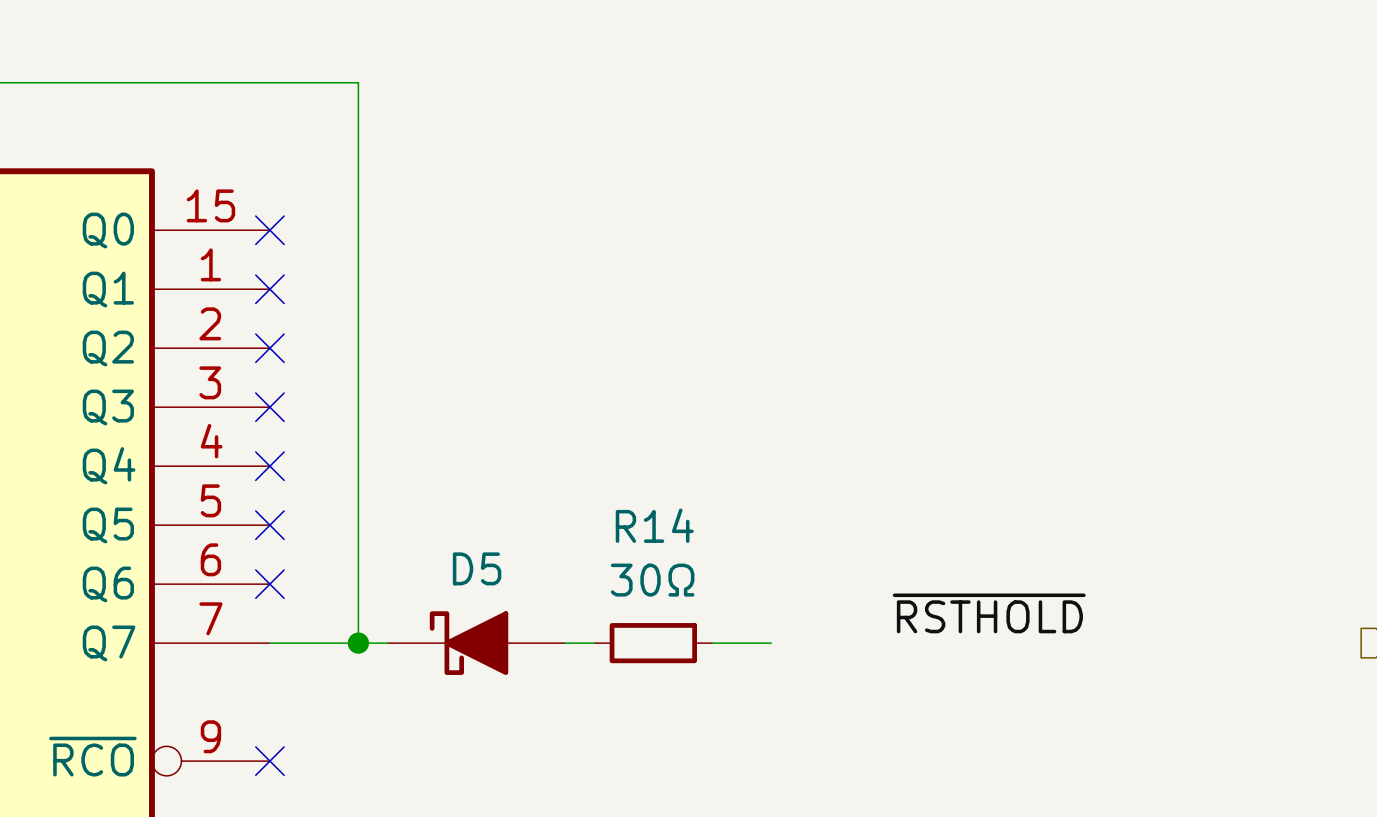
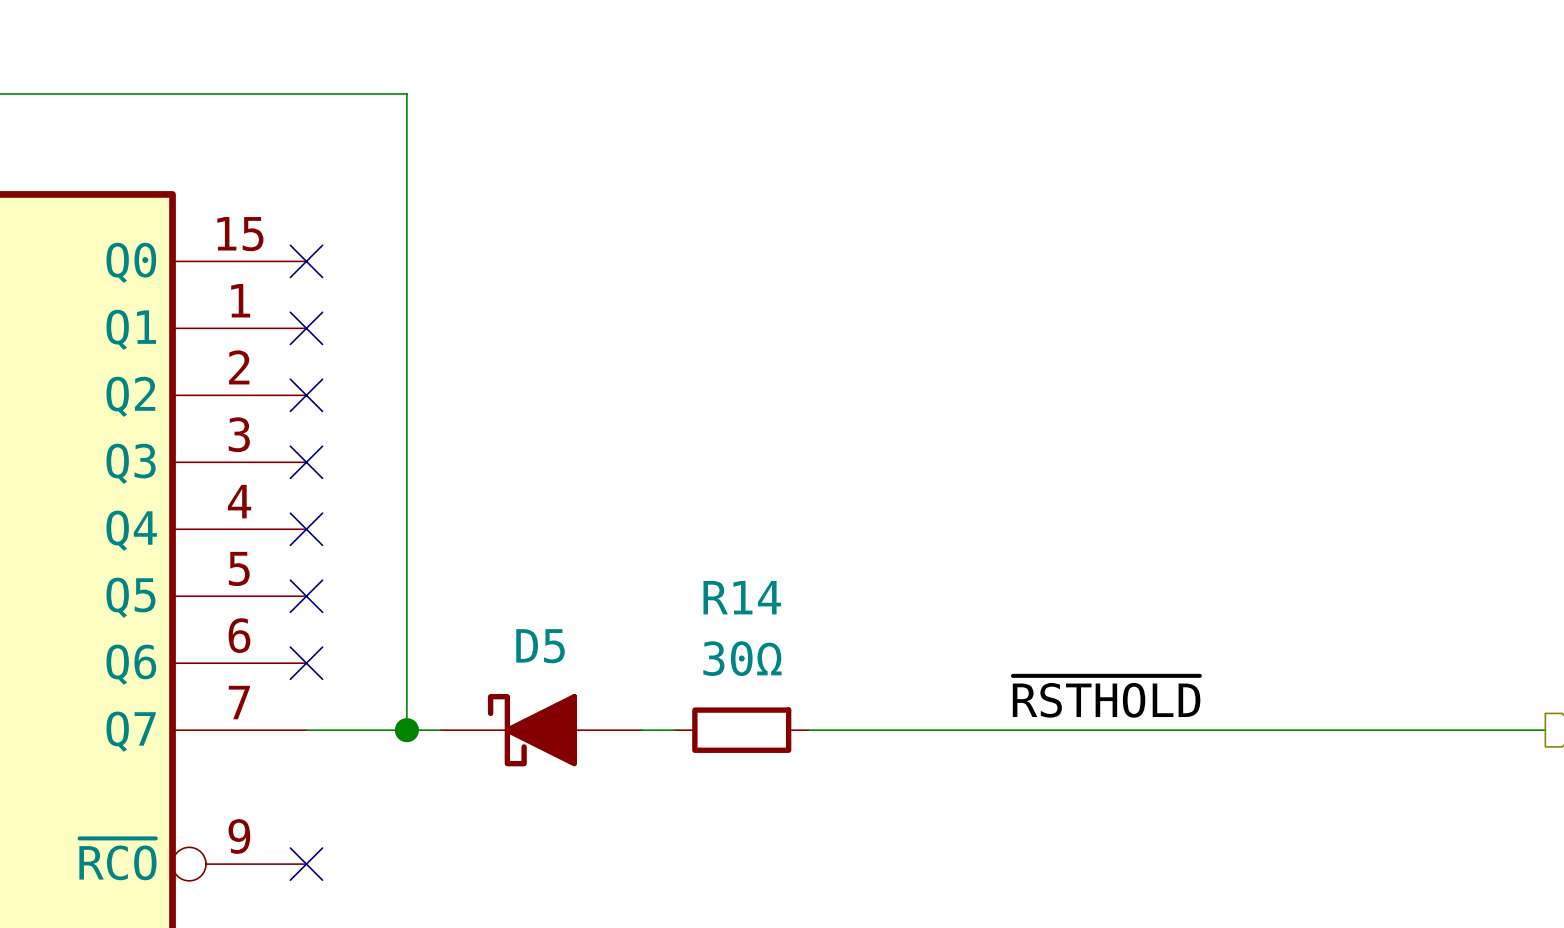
wire: none -> (875, 730) (1545, 730)

